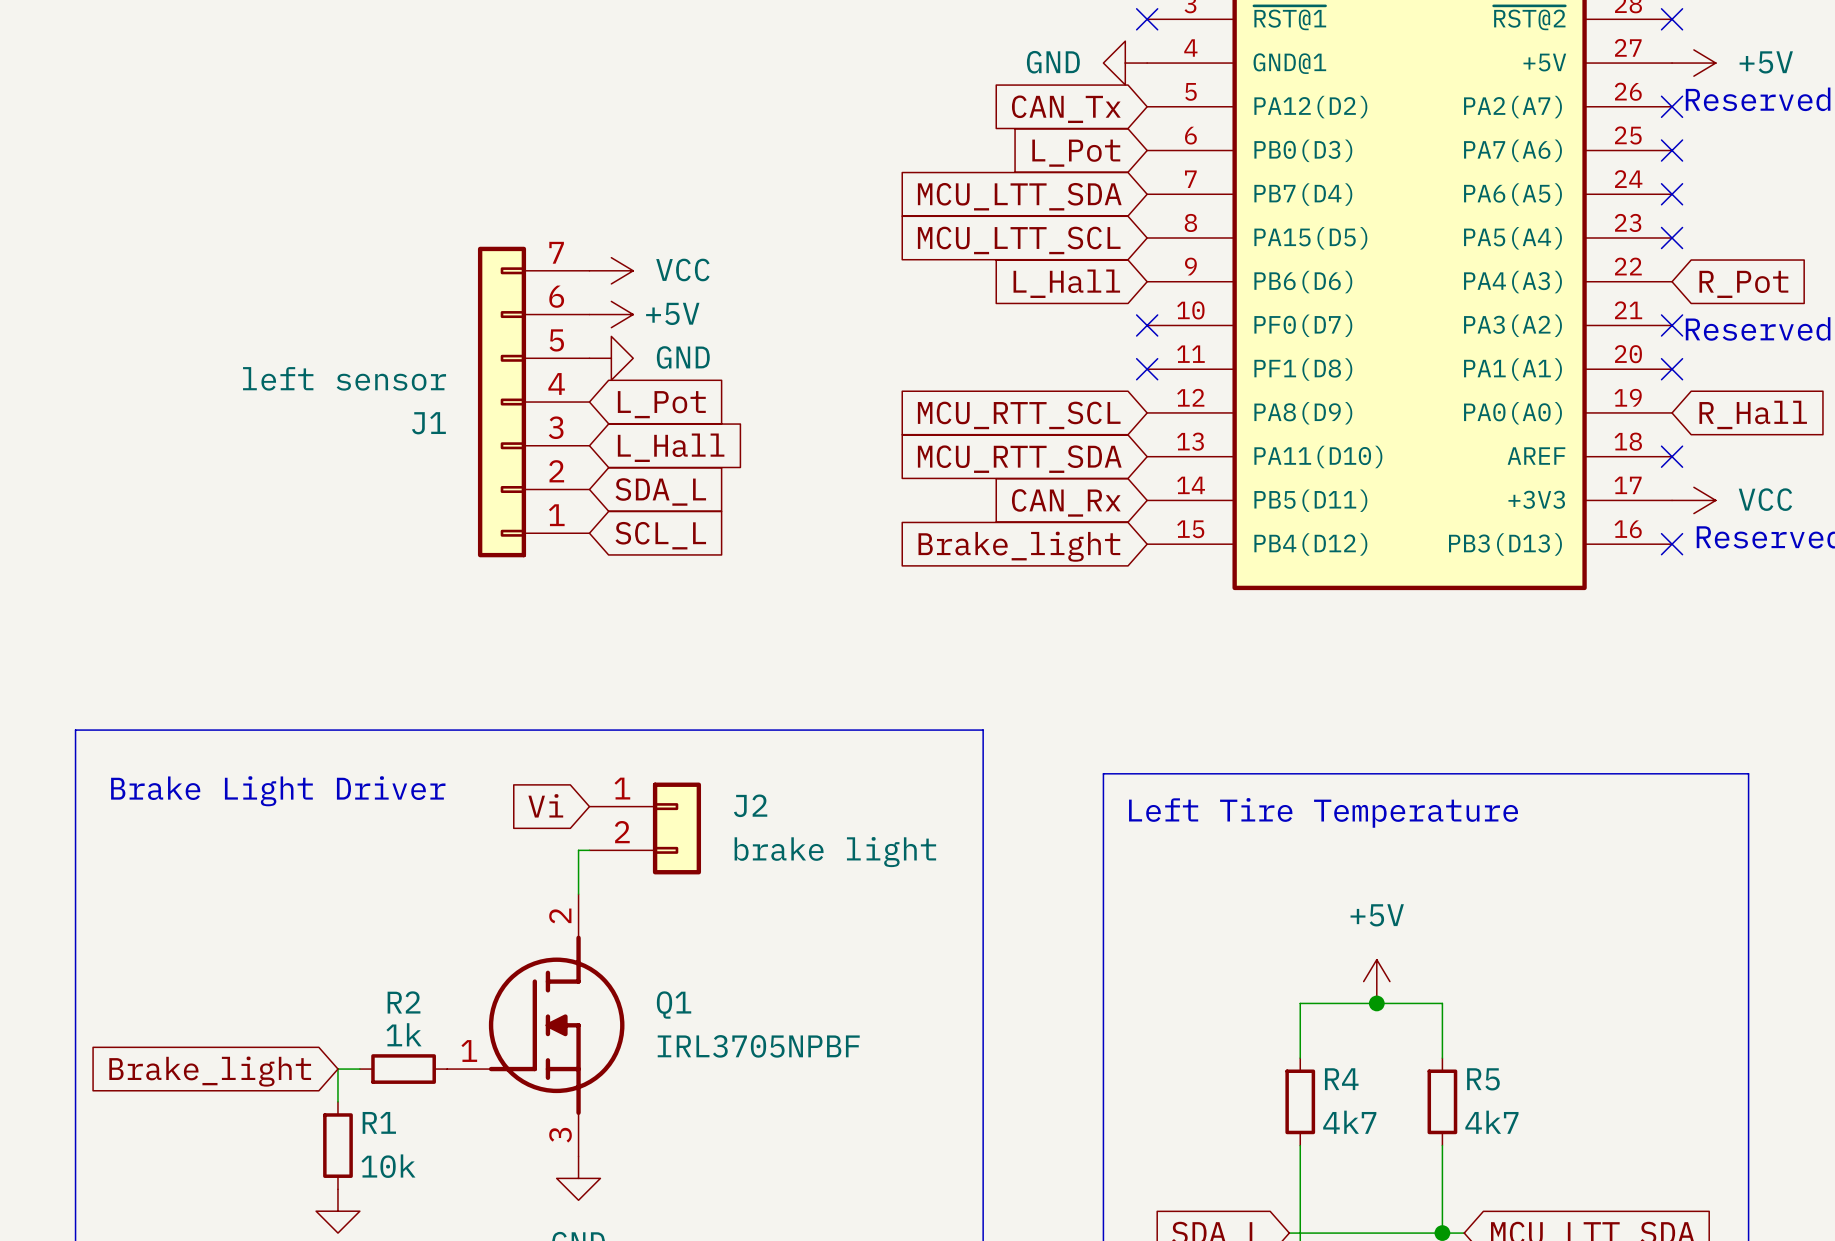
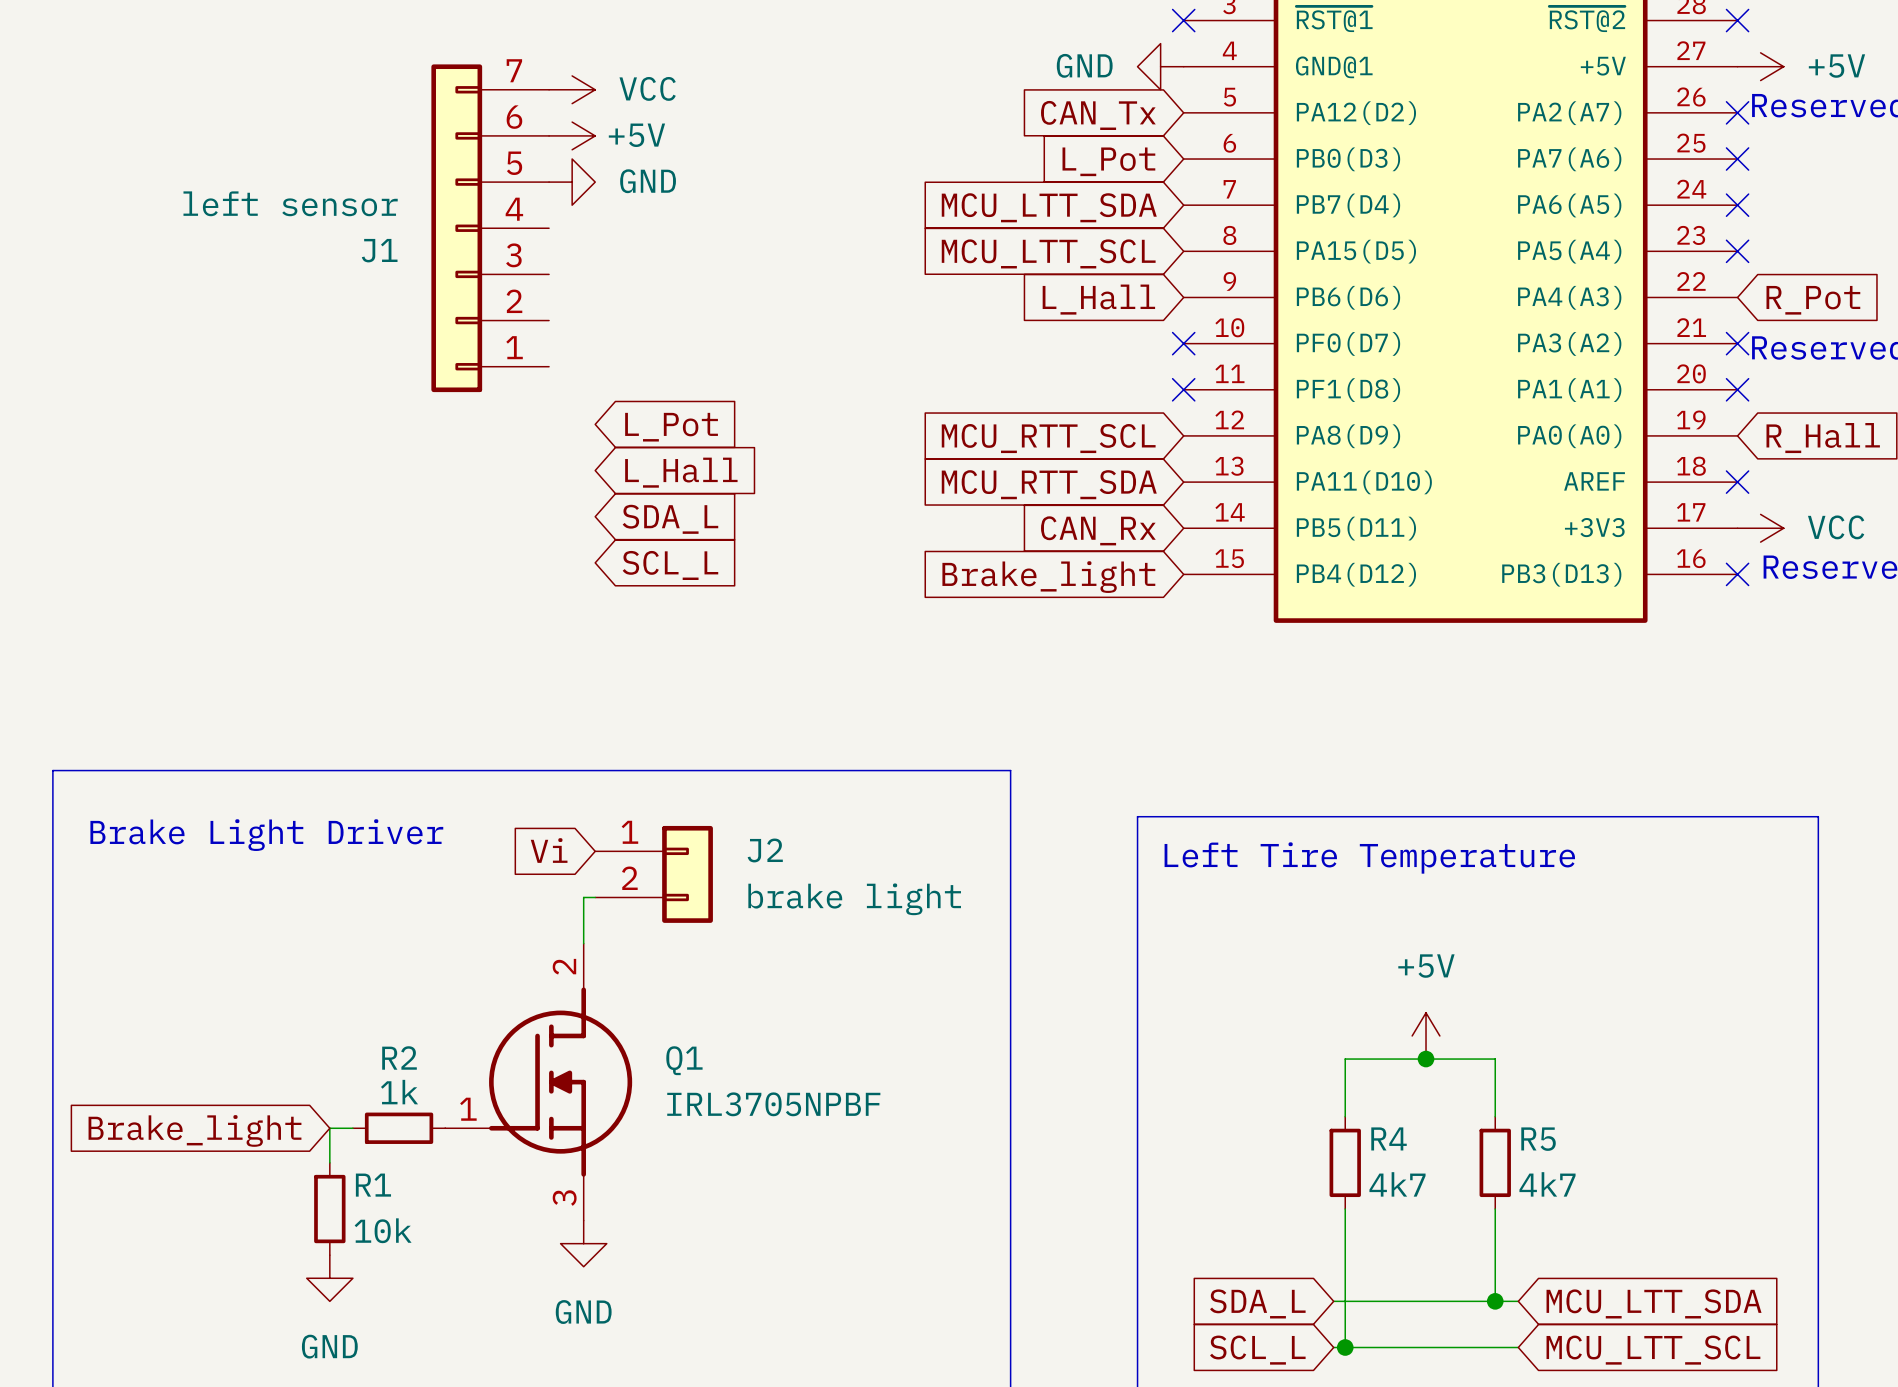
power symbol position: VCC (611, 270) -> VCC (572, 89)
power symbol position: +5V (611, 314) -> +5V (572, 135)
power symbol position: GND (611, 358) -> GND (572, 182)
J1 position: (533, 402) -> (490, 228)

